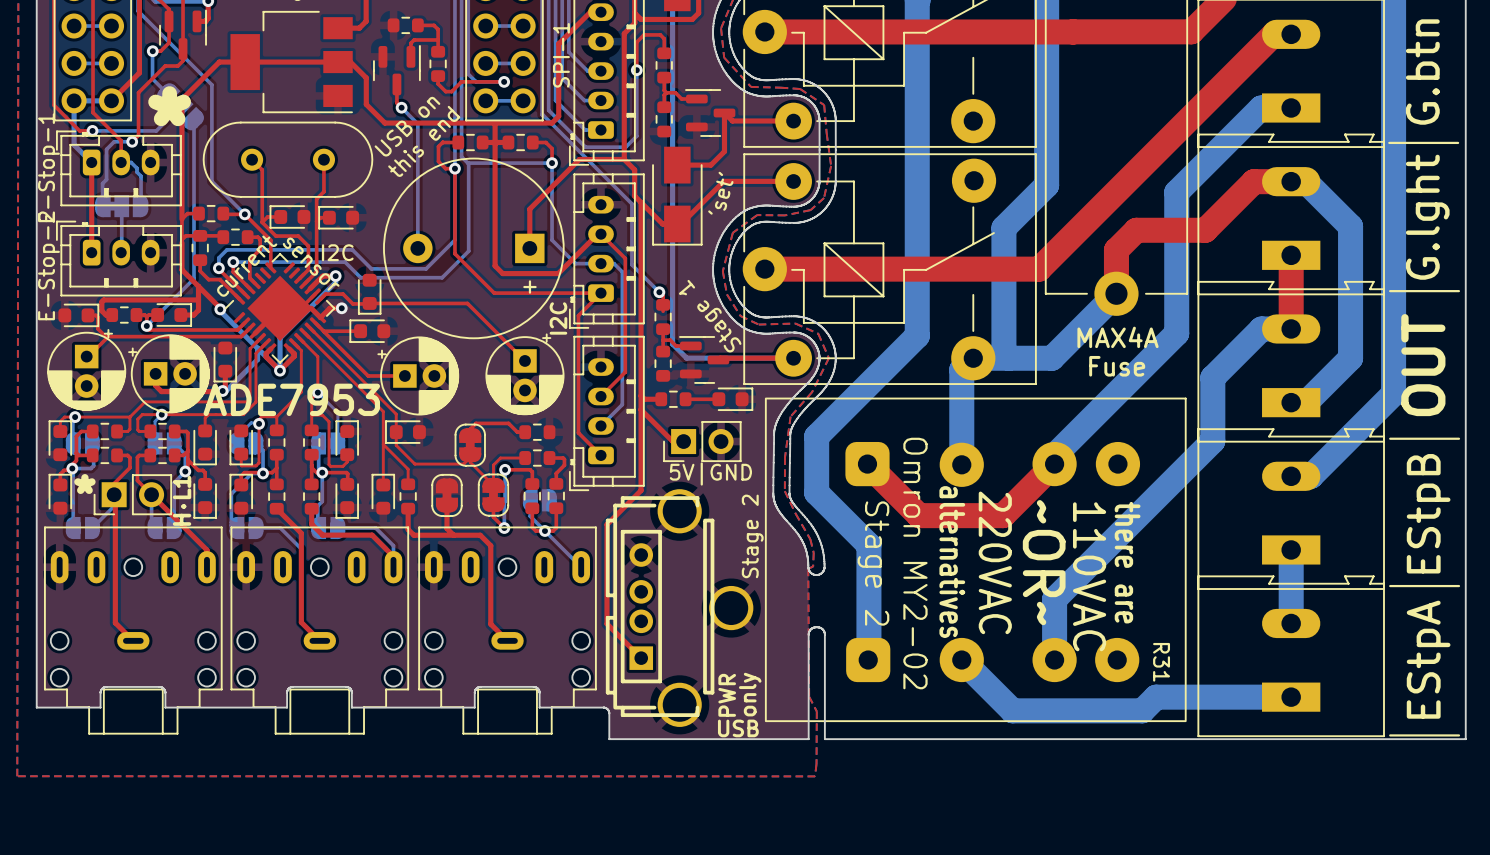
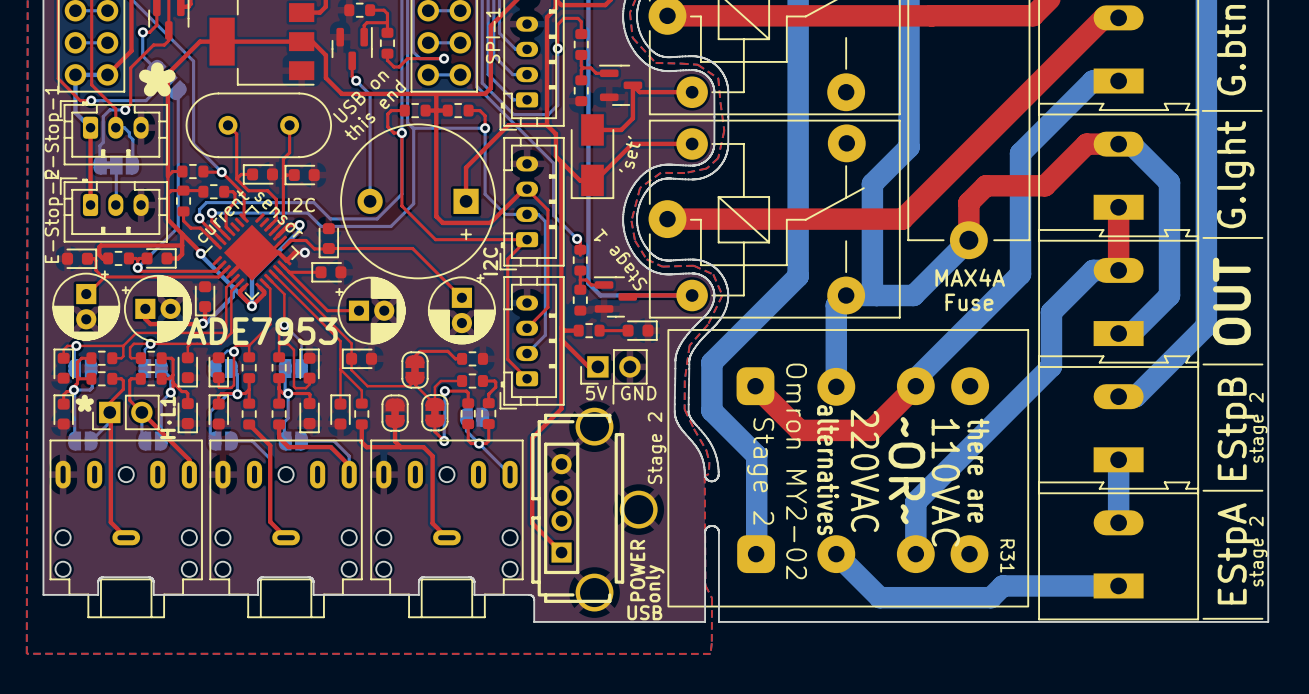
text: none -> stage 2 (1258, 427)
text: none -> stage 2 (1258, 551)
text: PWR (727, 695) -> POWER (637, 570)

